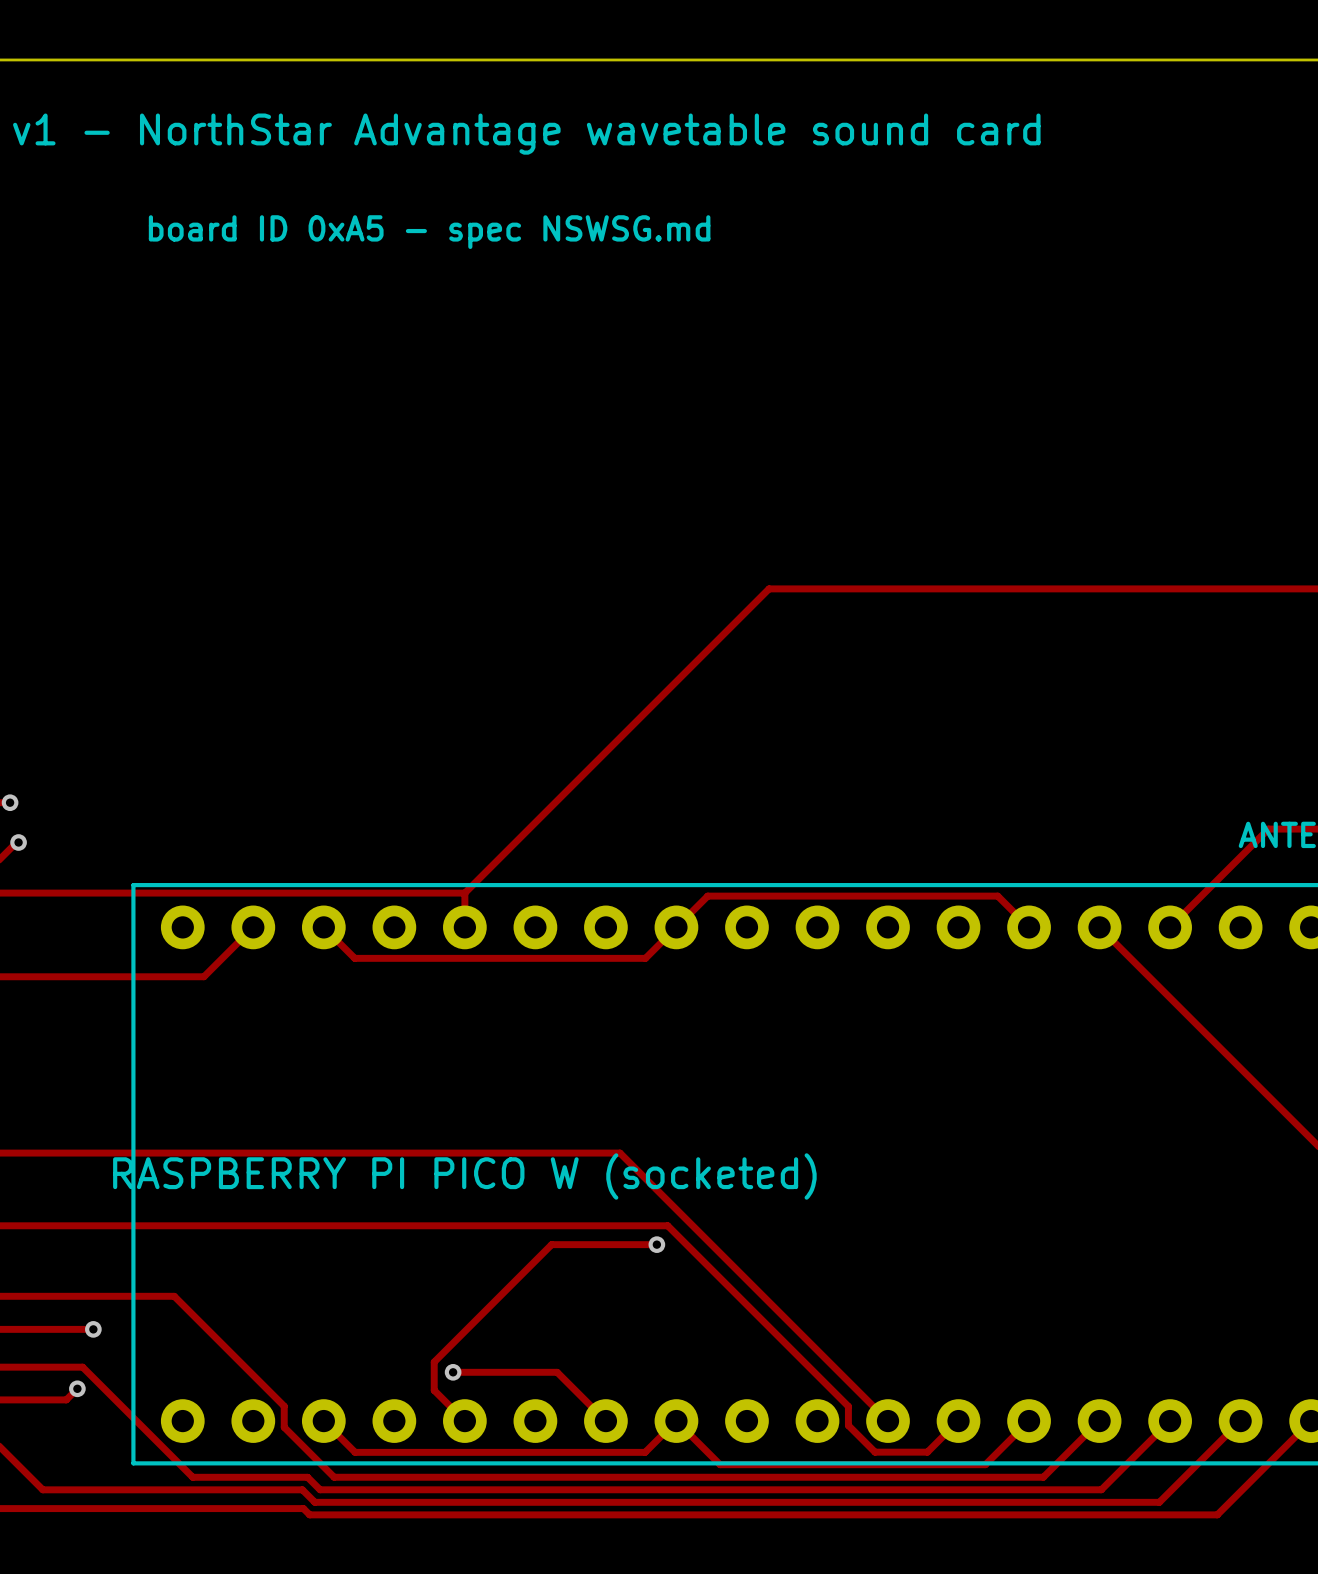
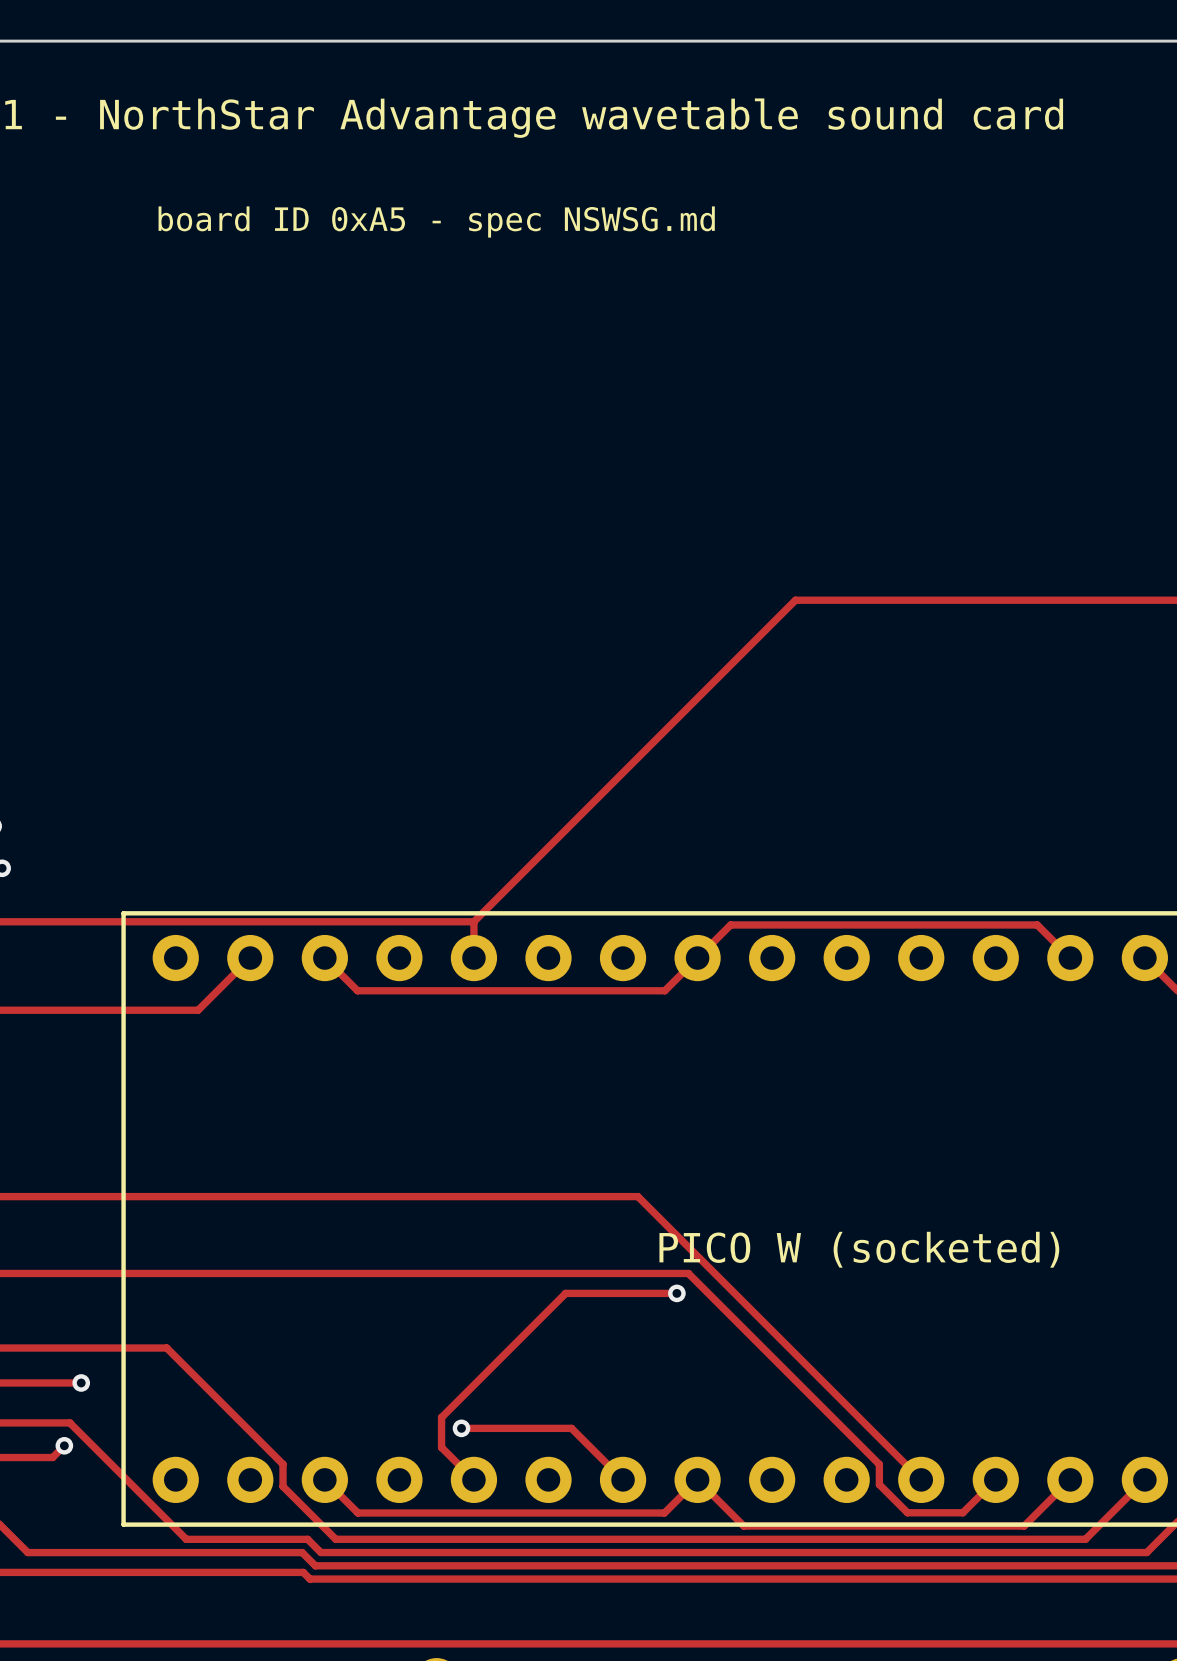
text: RASPBERRY PI PICO W (socketed) (464, 1176) -> PICO W (socketed) (859, 1249)

